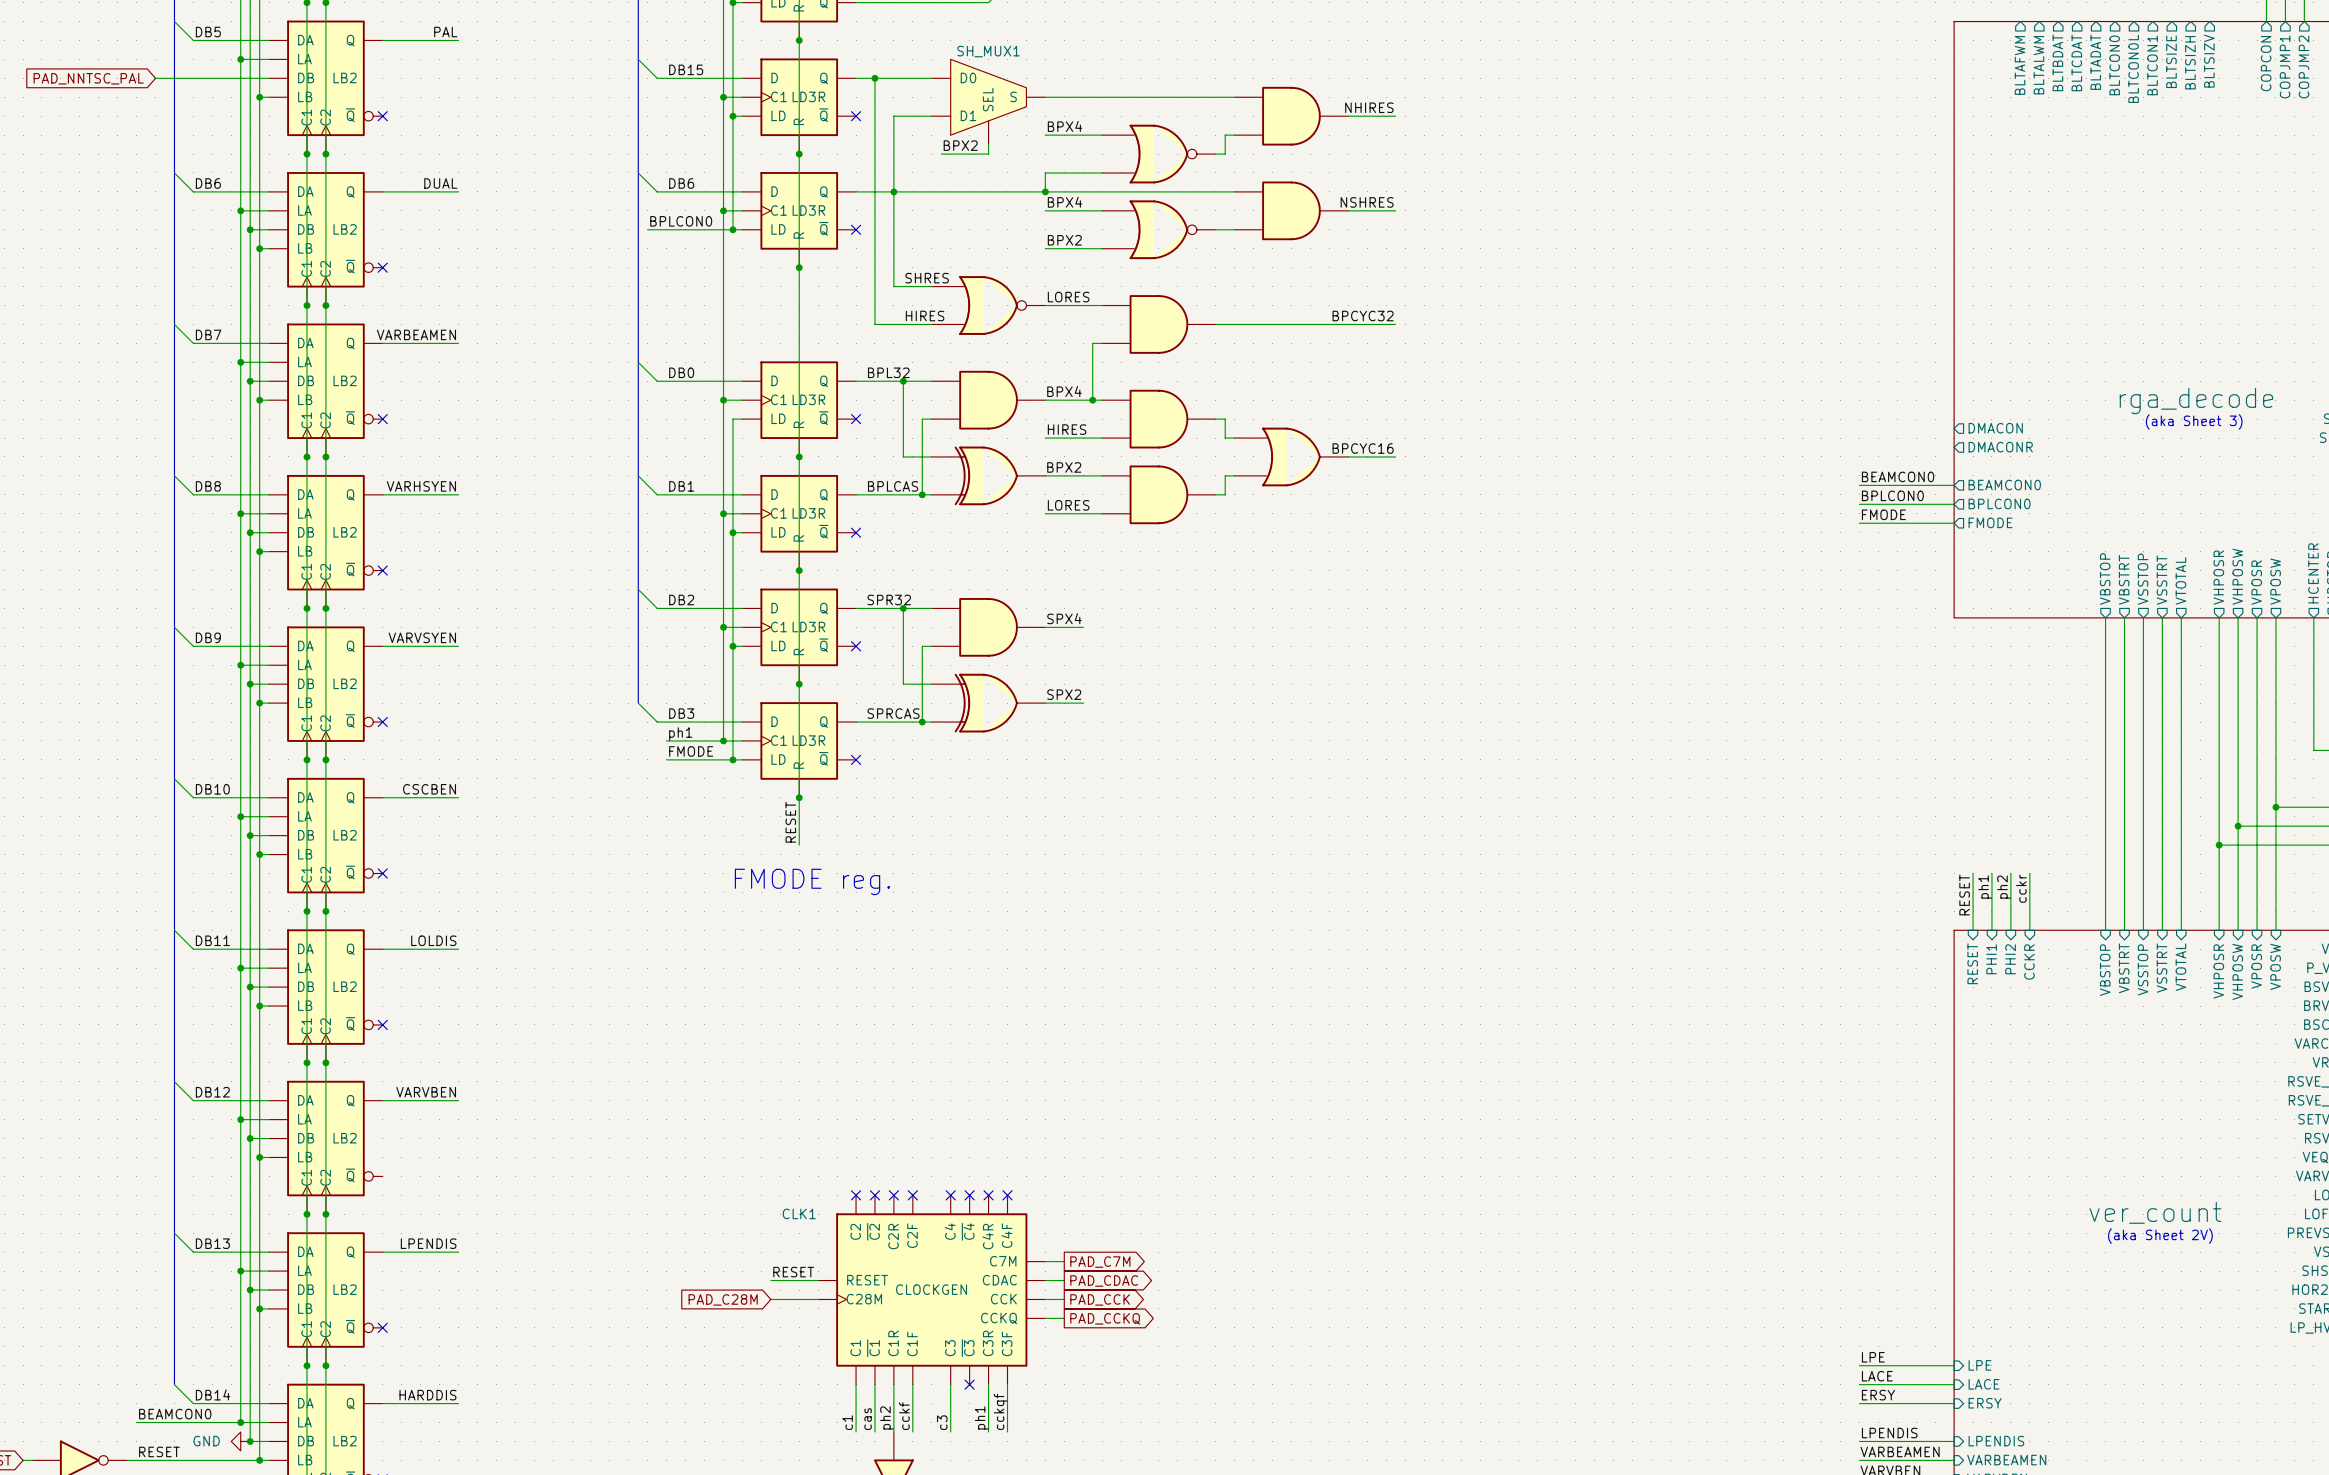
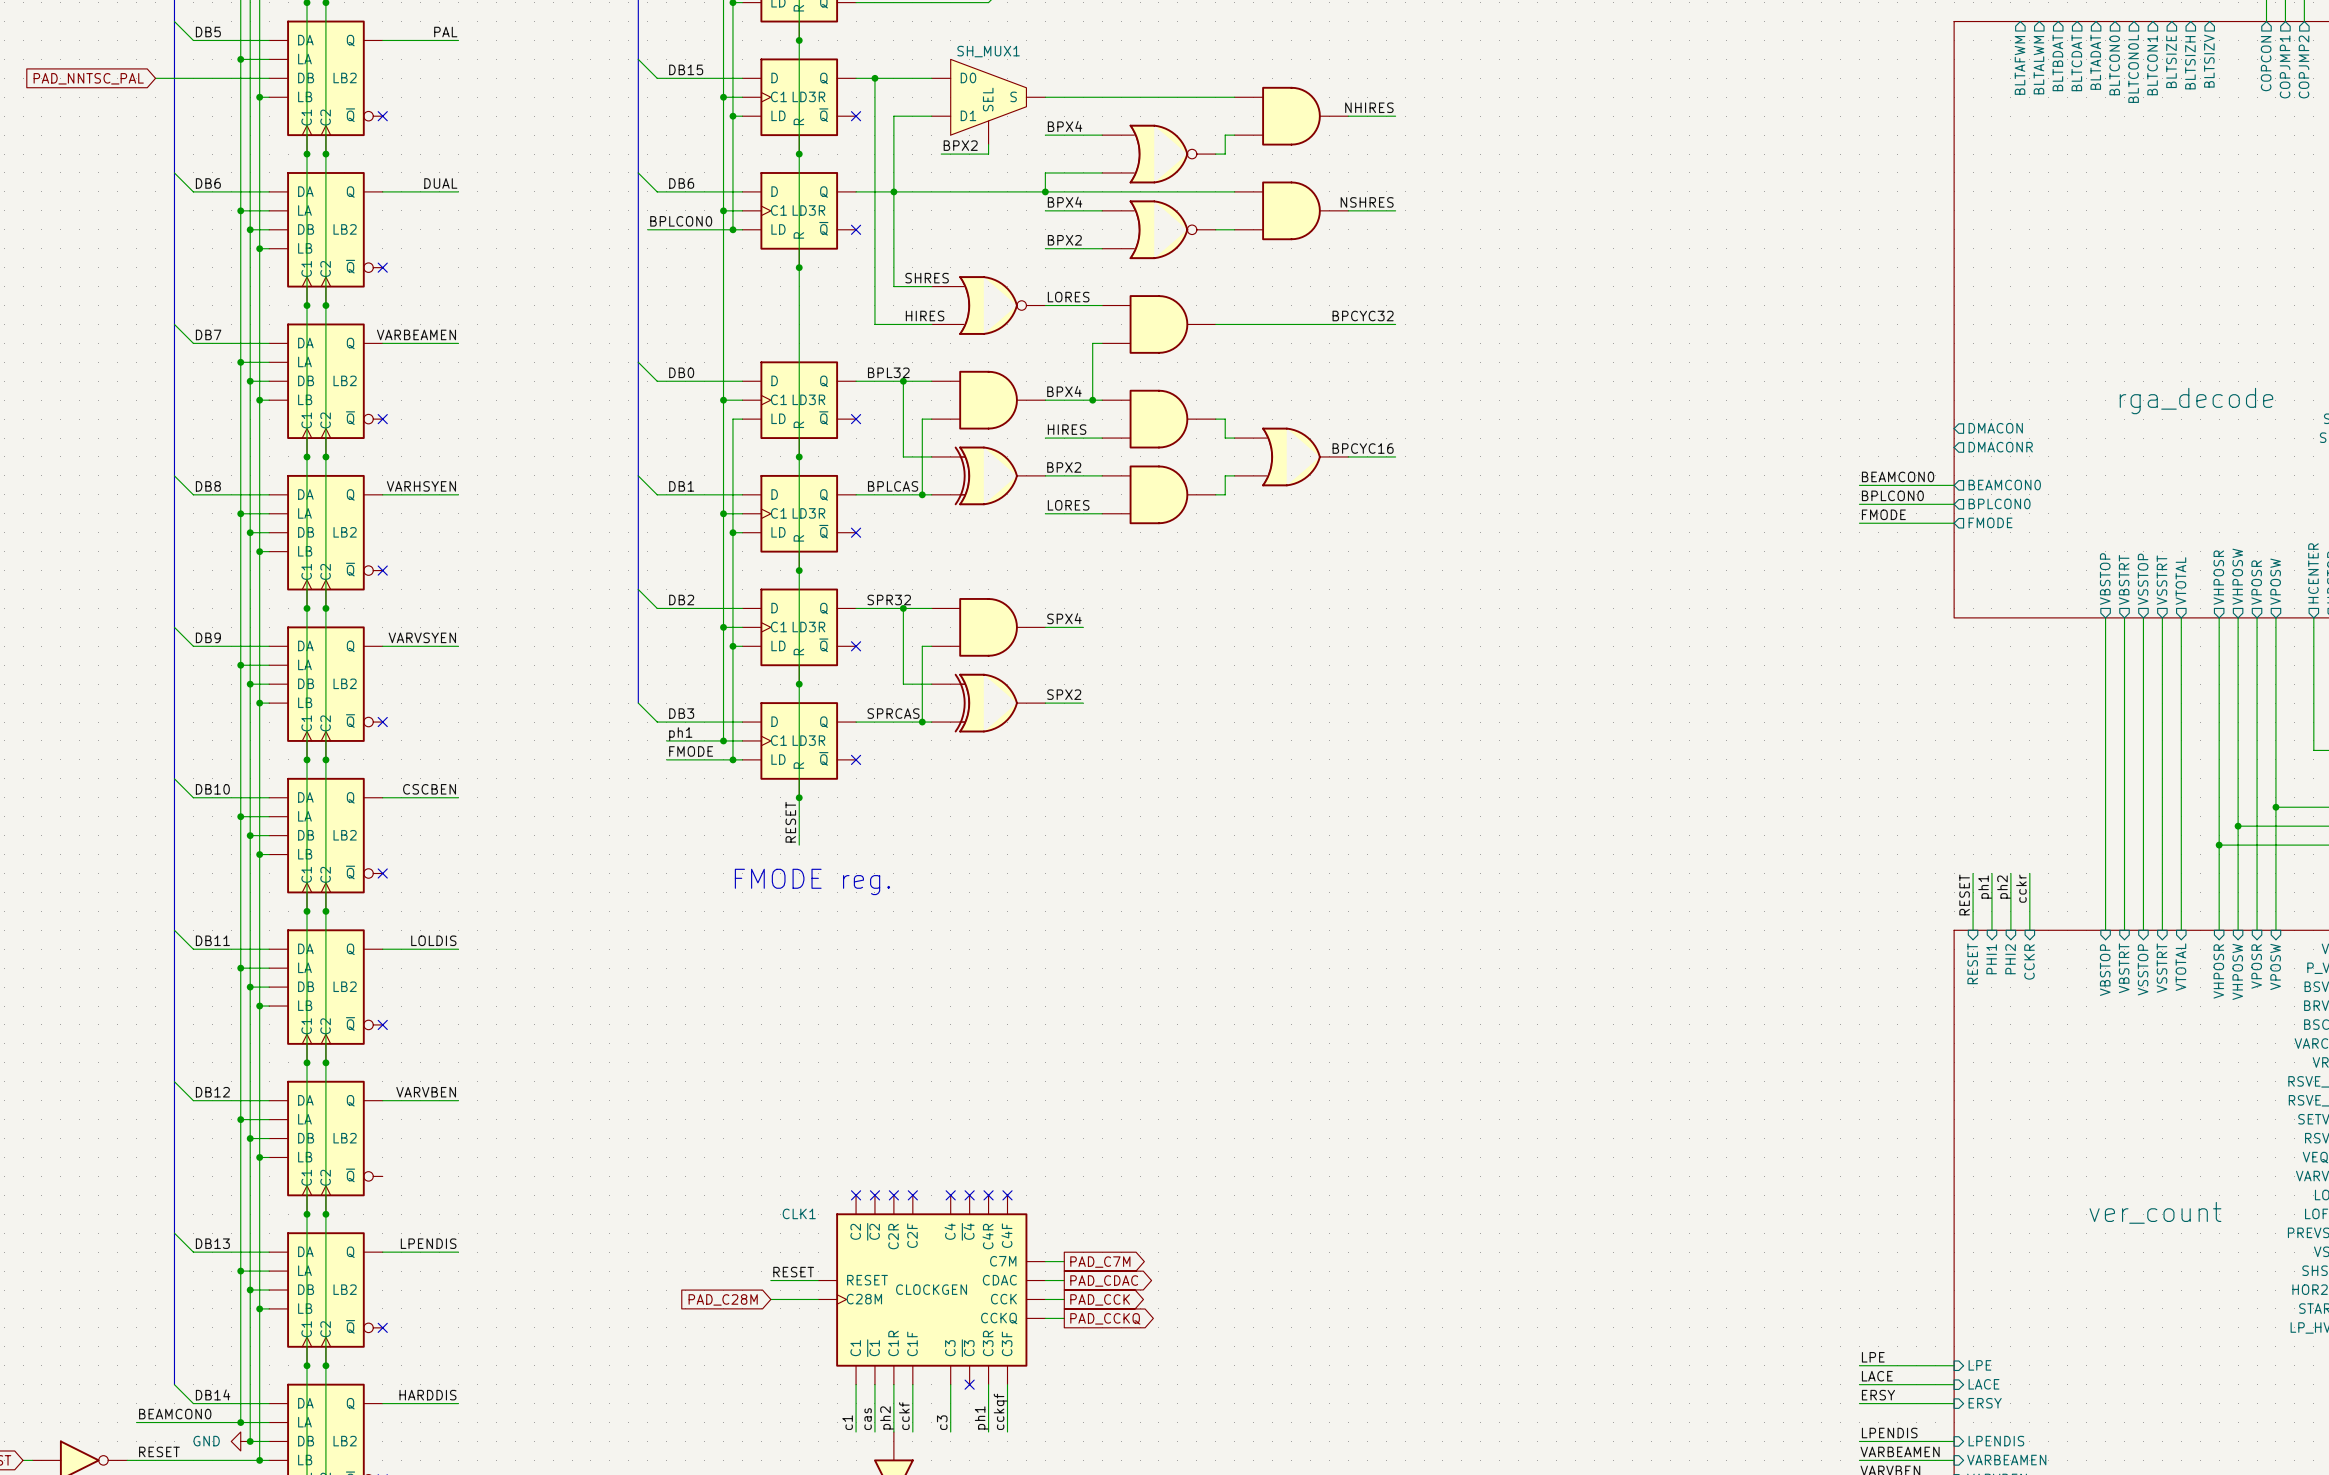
text: (aka Sheet 3) (2194, 421) -> none
text: (aka Sheet 2V) (2160, 1236) -> none

